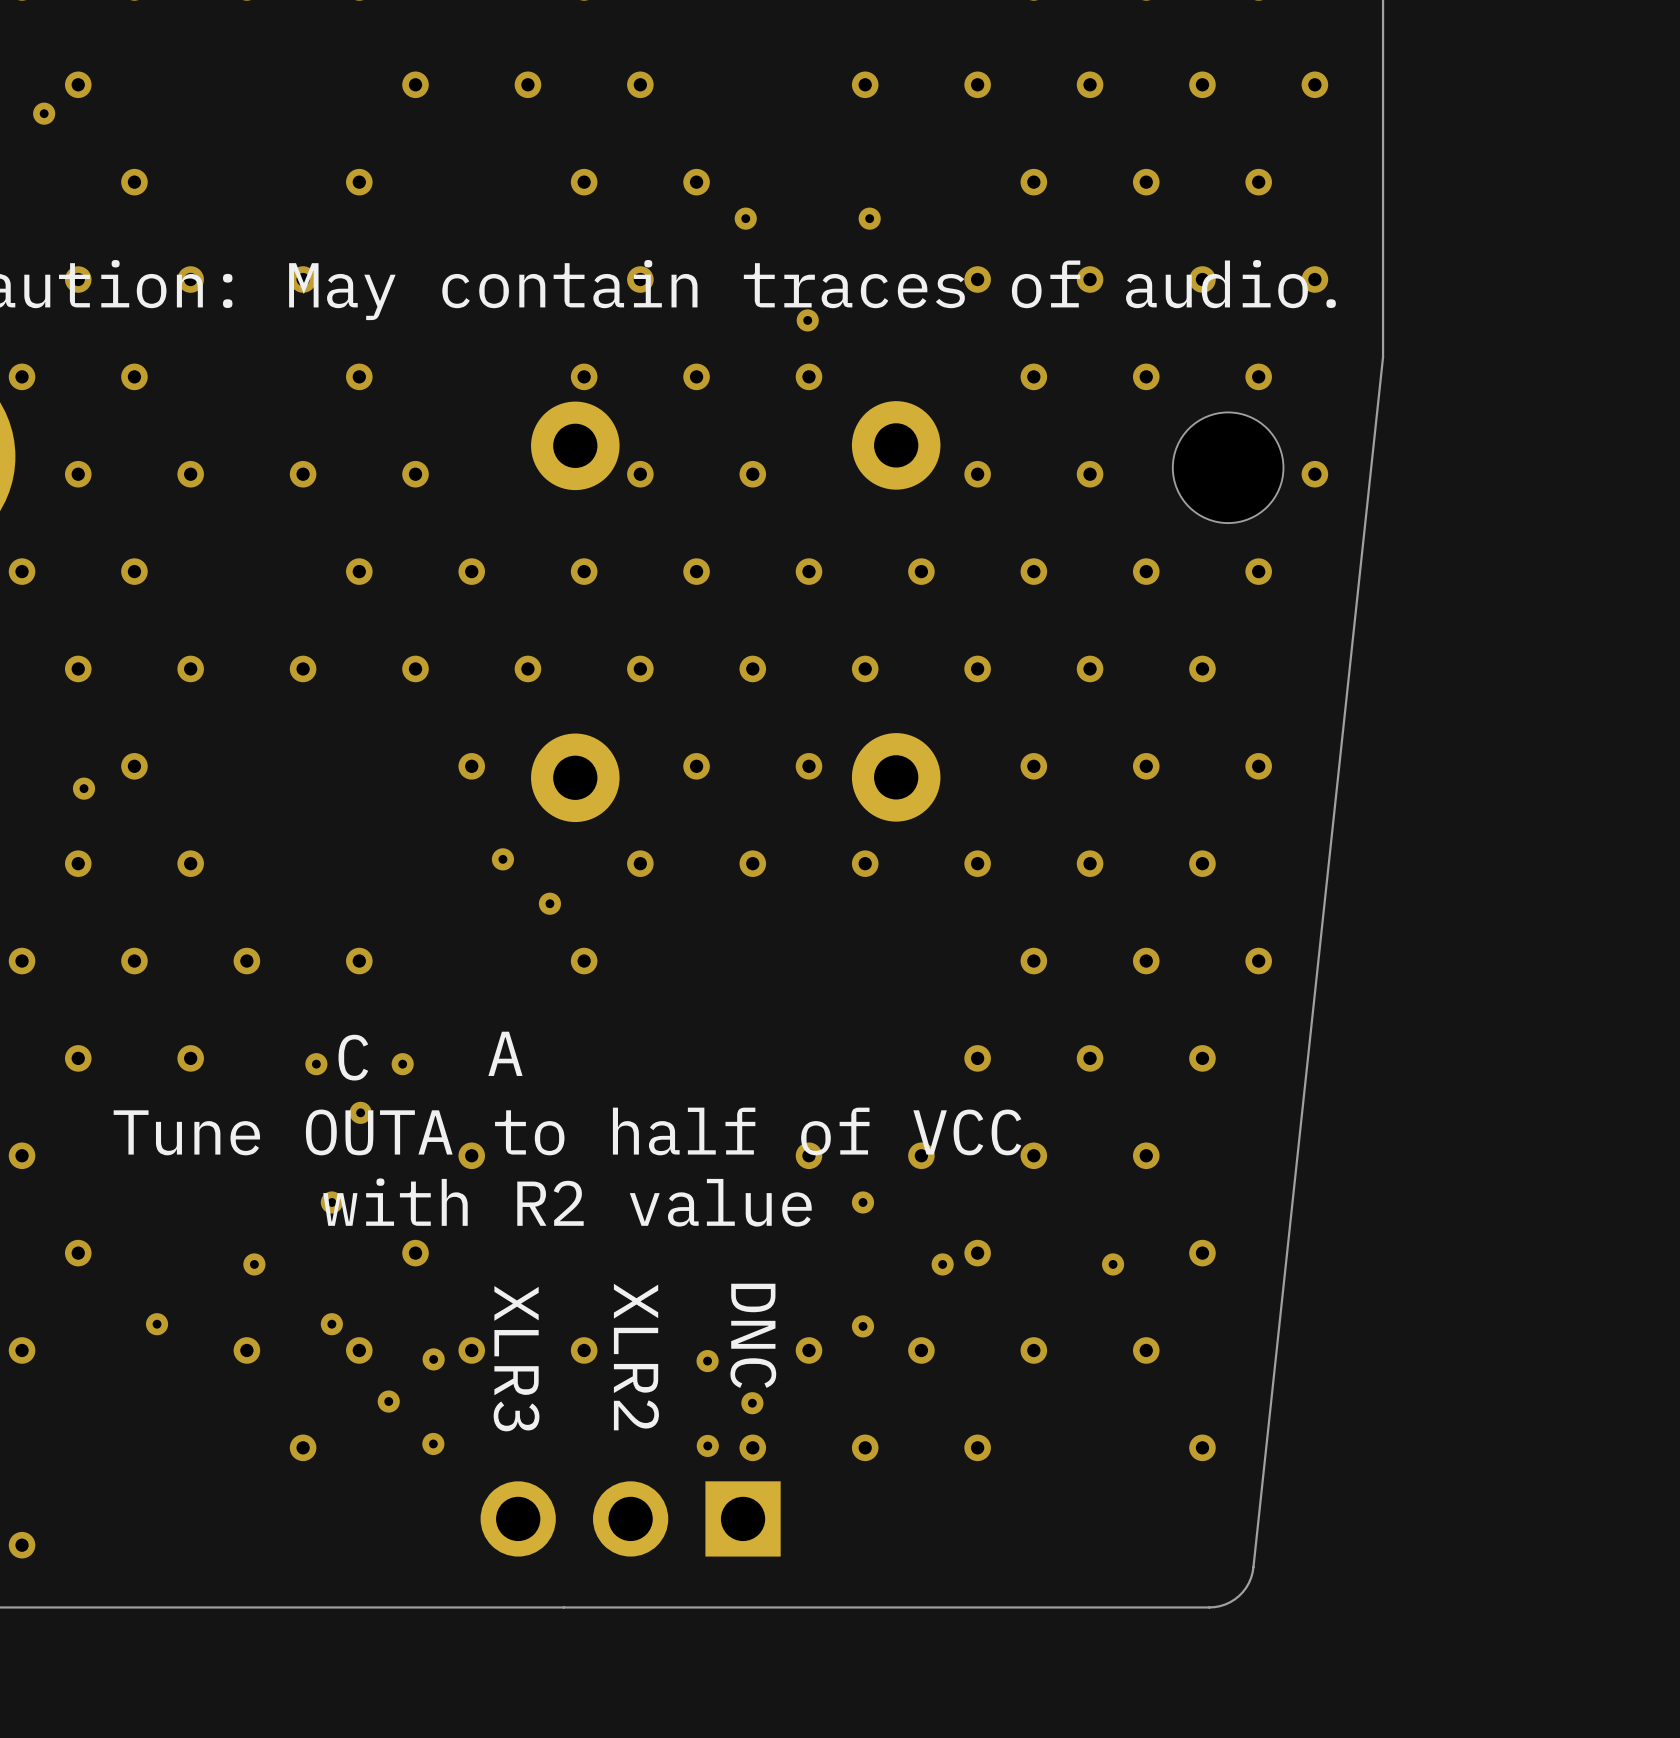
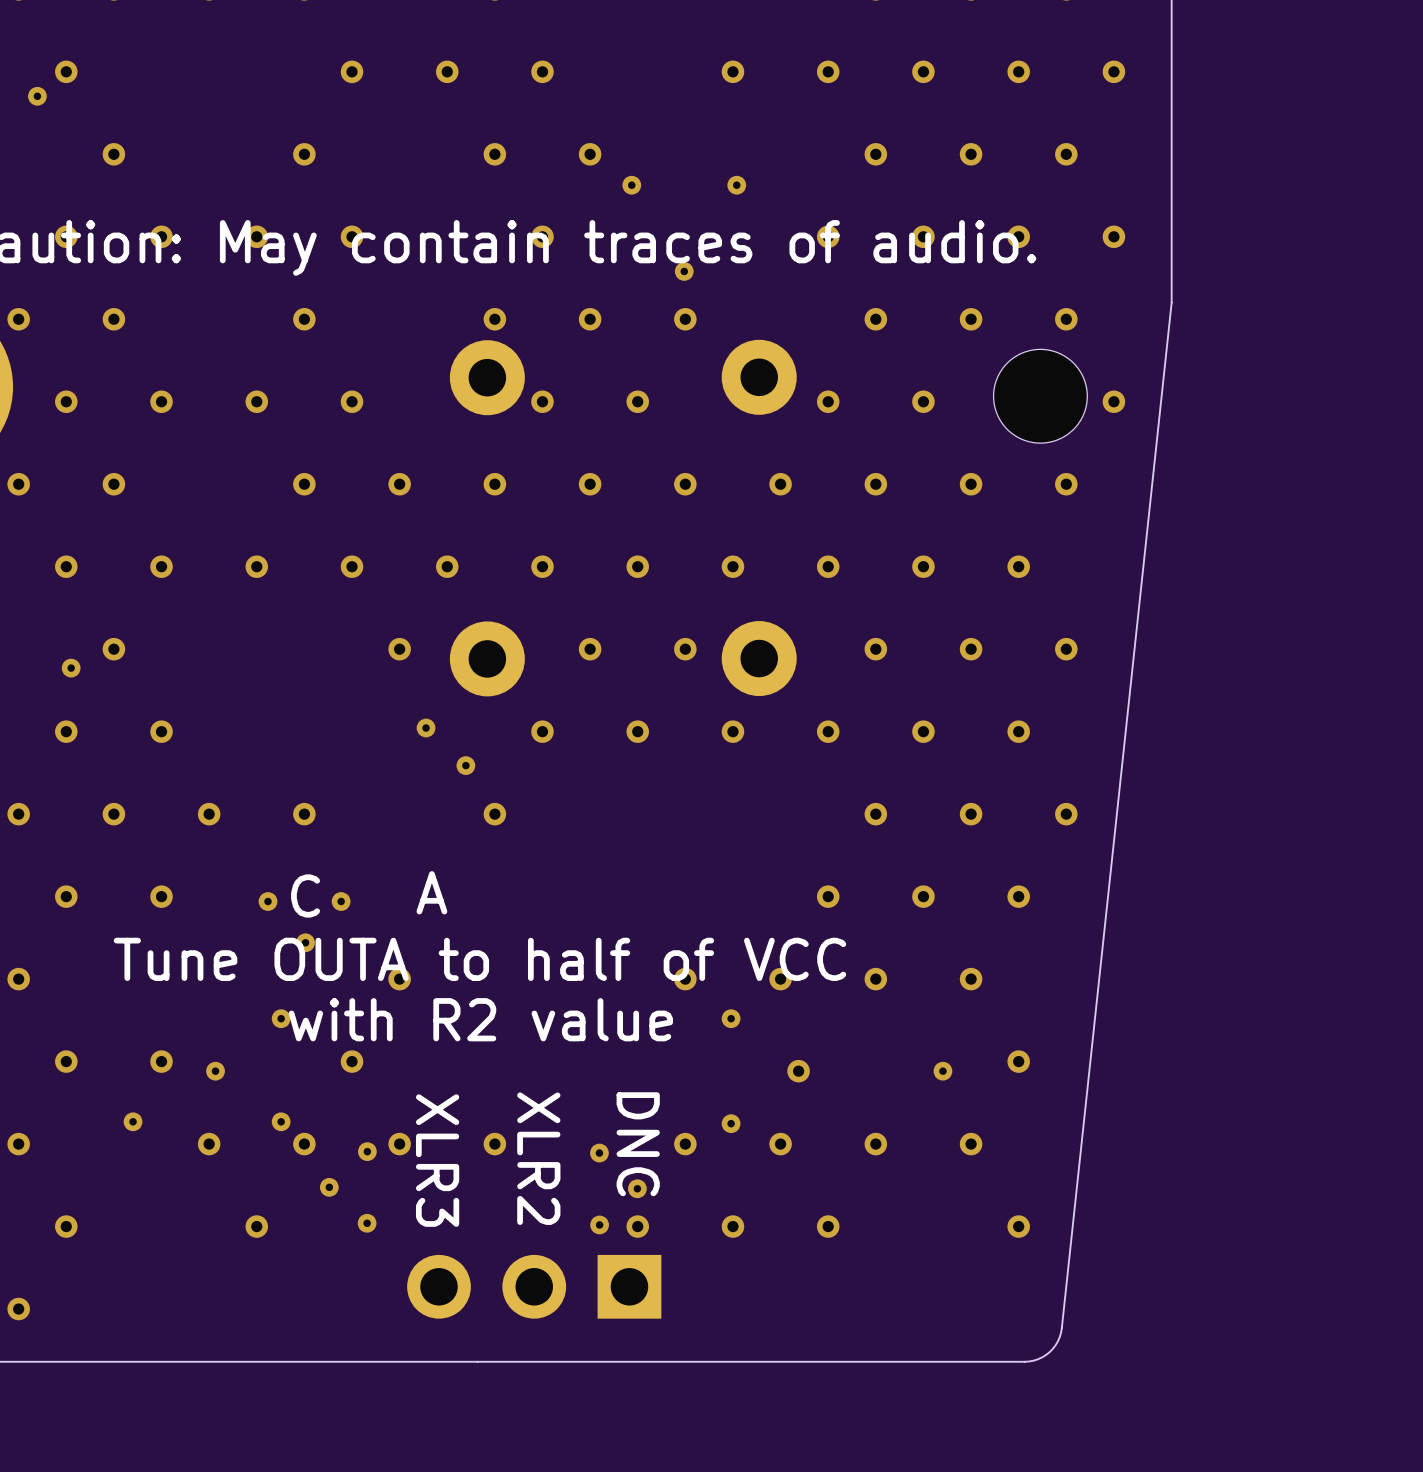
via: none -> (352, 236)
via: none -> (161, 1061)
via position: (977, 1253) -> (798, 1071)
via: (942, 1264) -> none
via: none -> (66, 1226)

